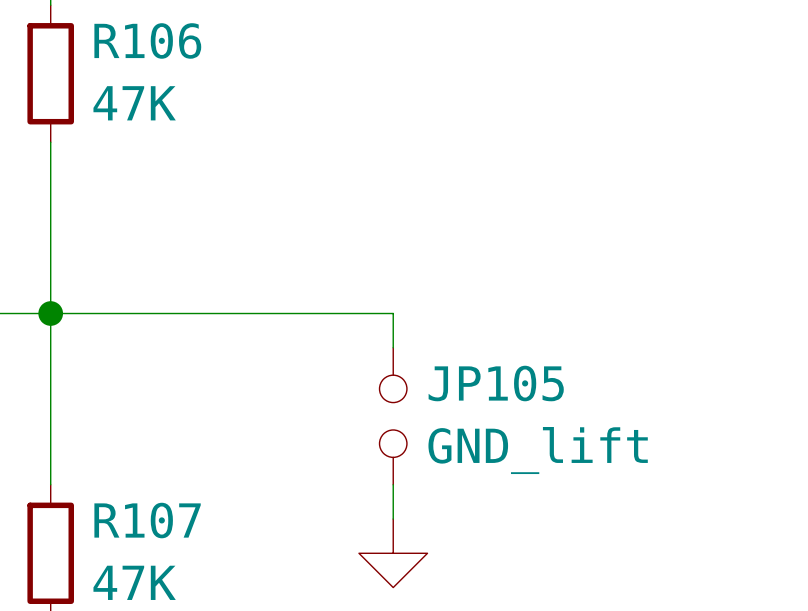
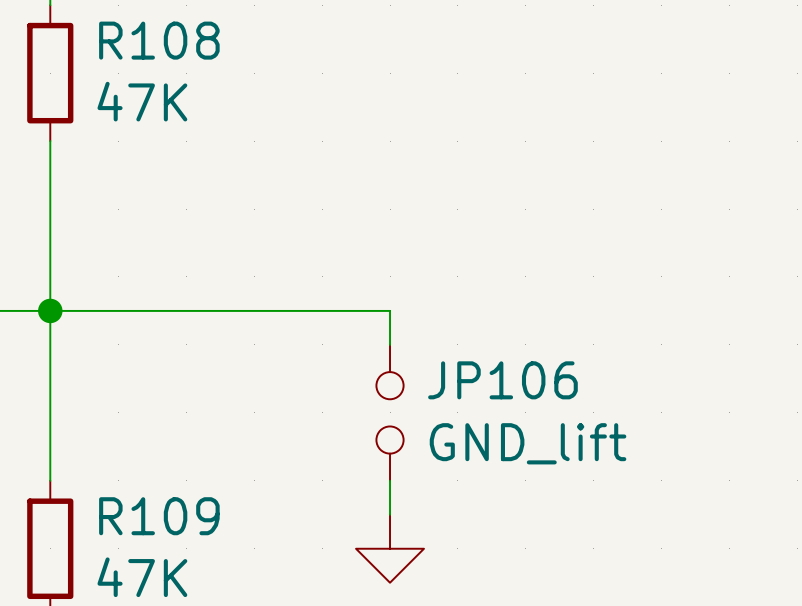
R106 name: R106 (147, 40) -> R108 (159, 40)
JP105 name: JP105 (496, 383) -> JP106 (502, 380)
R107 name: R107 (147, 520) -> R109 (159, 516)

